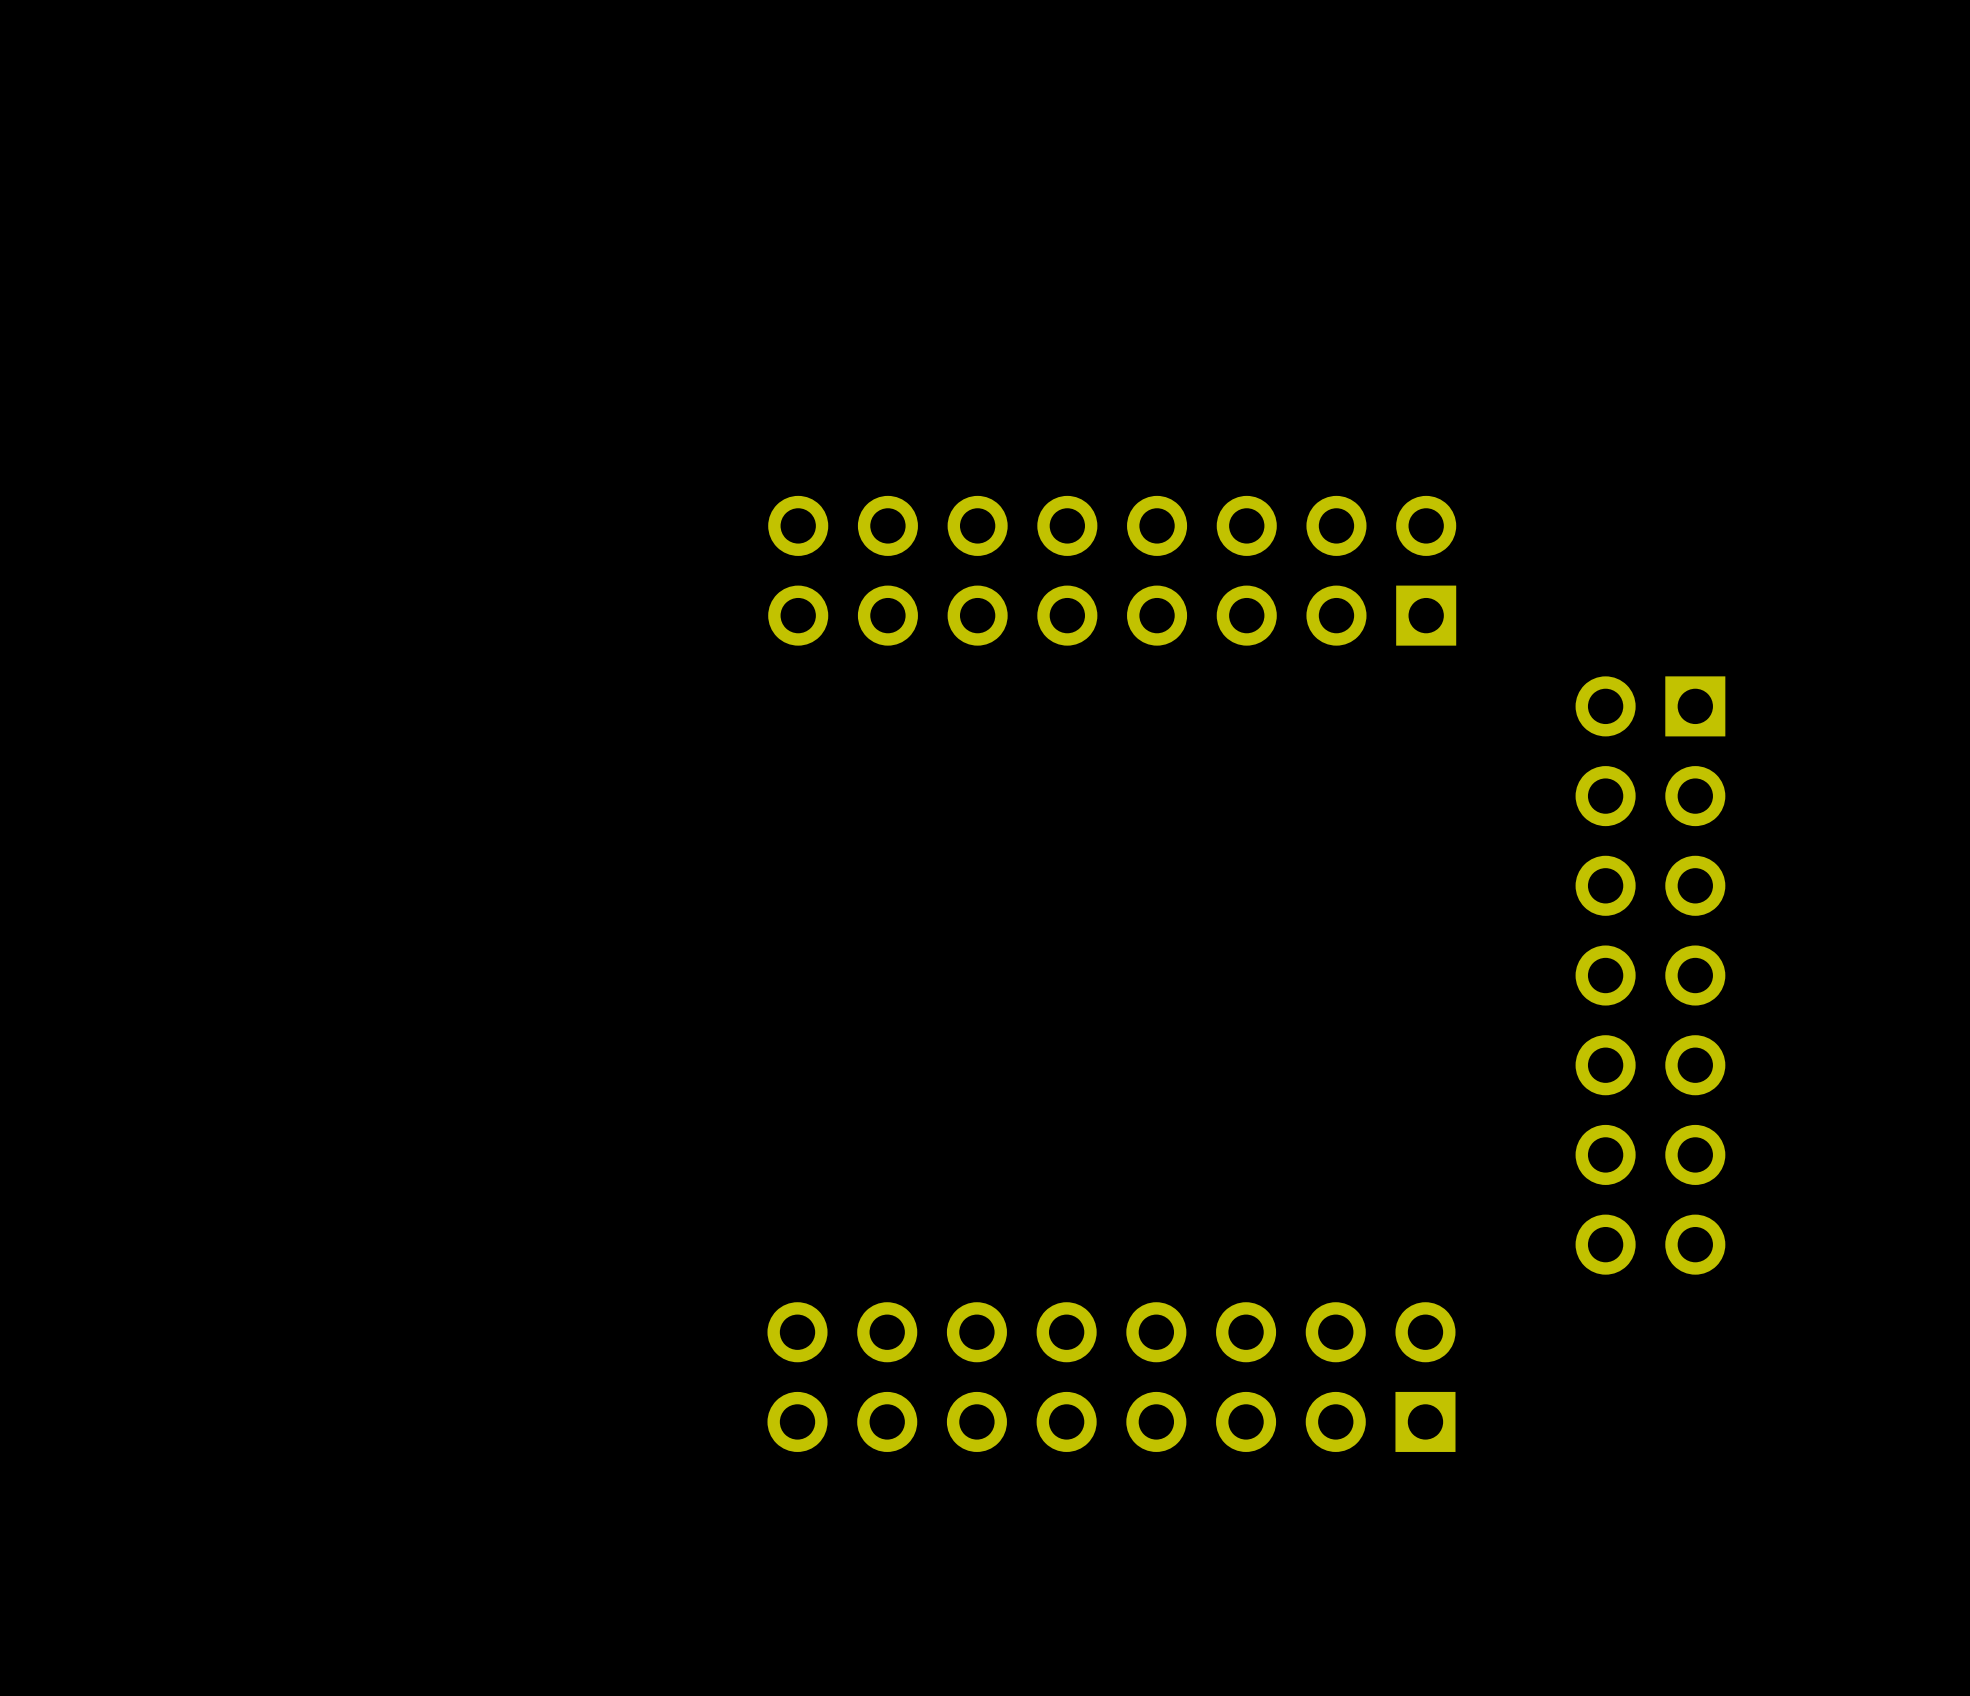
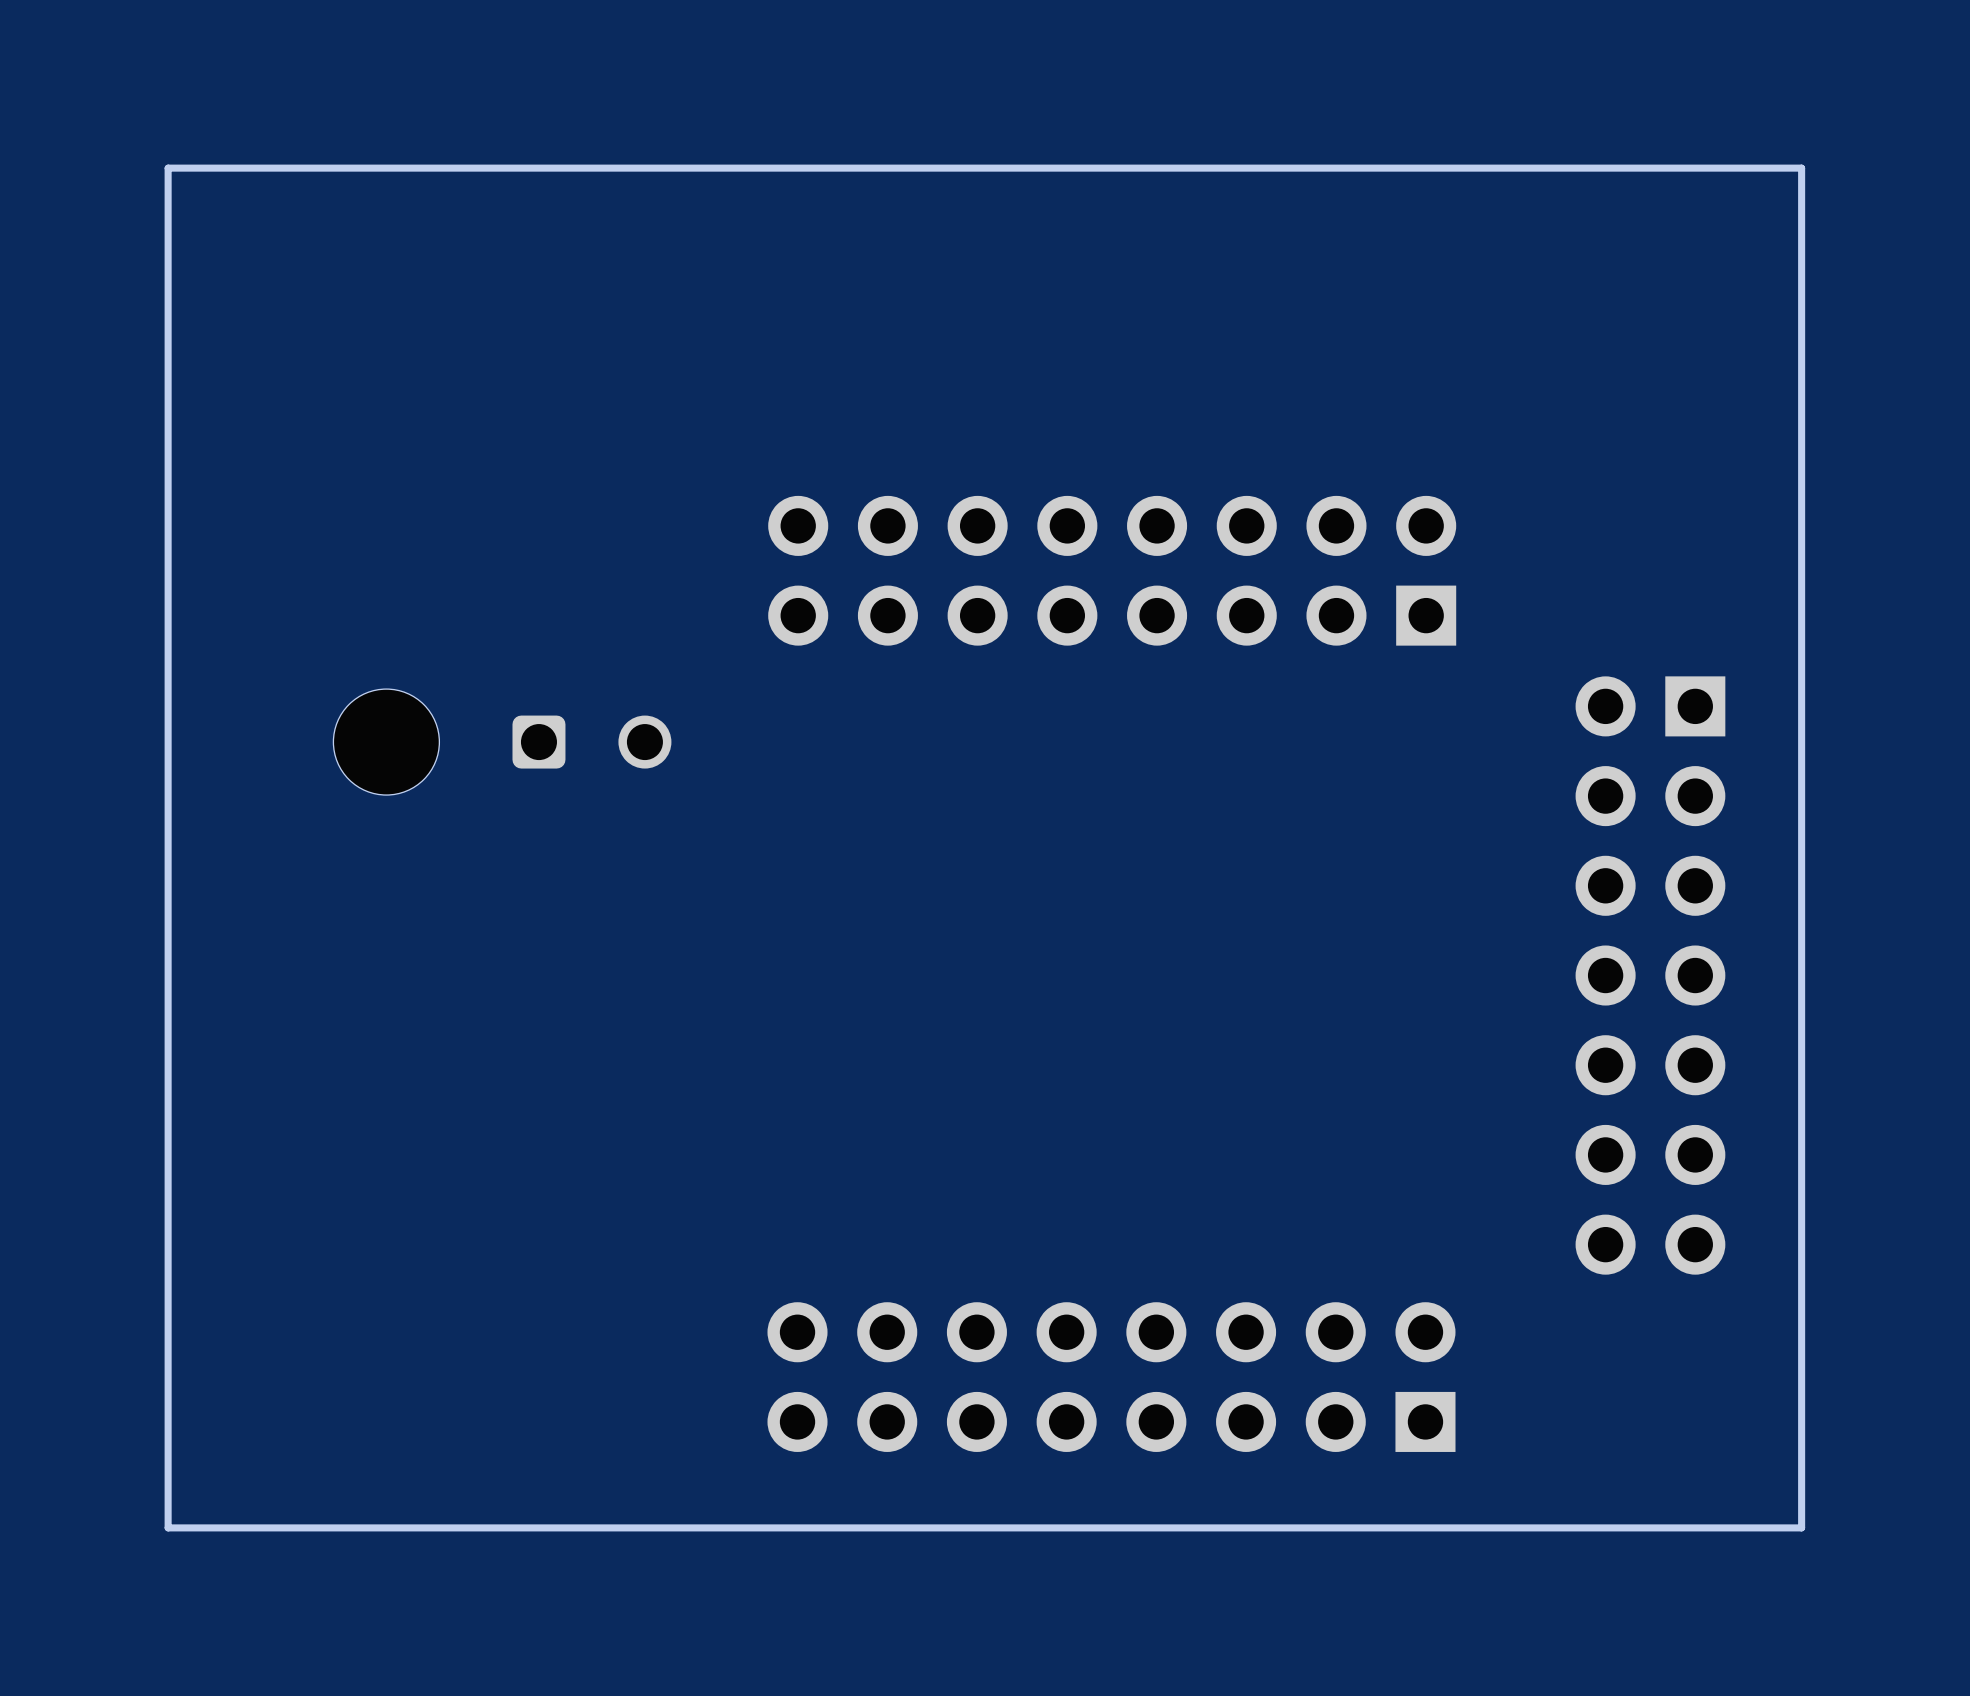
board edge: none -> (1801, 168) (168, 168) (168, 1527) (1801, 1527) (1801, 168)
part: none -> (502, 742)

